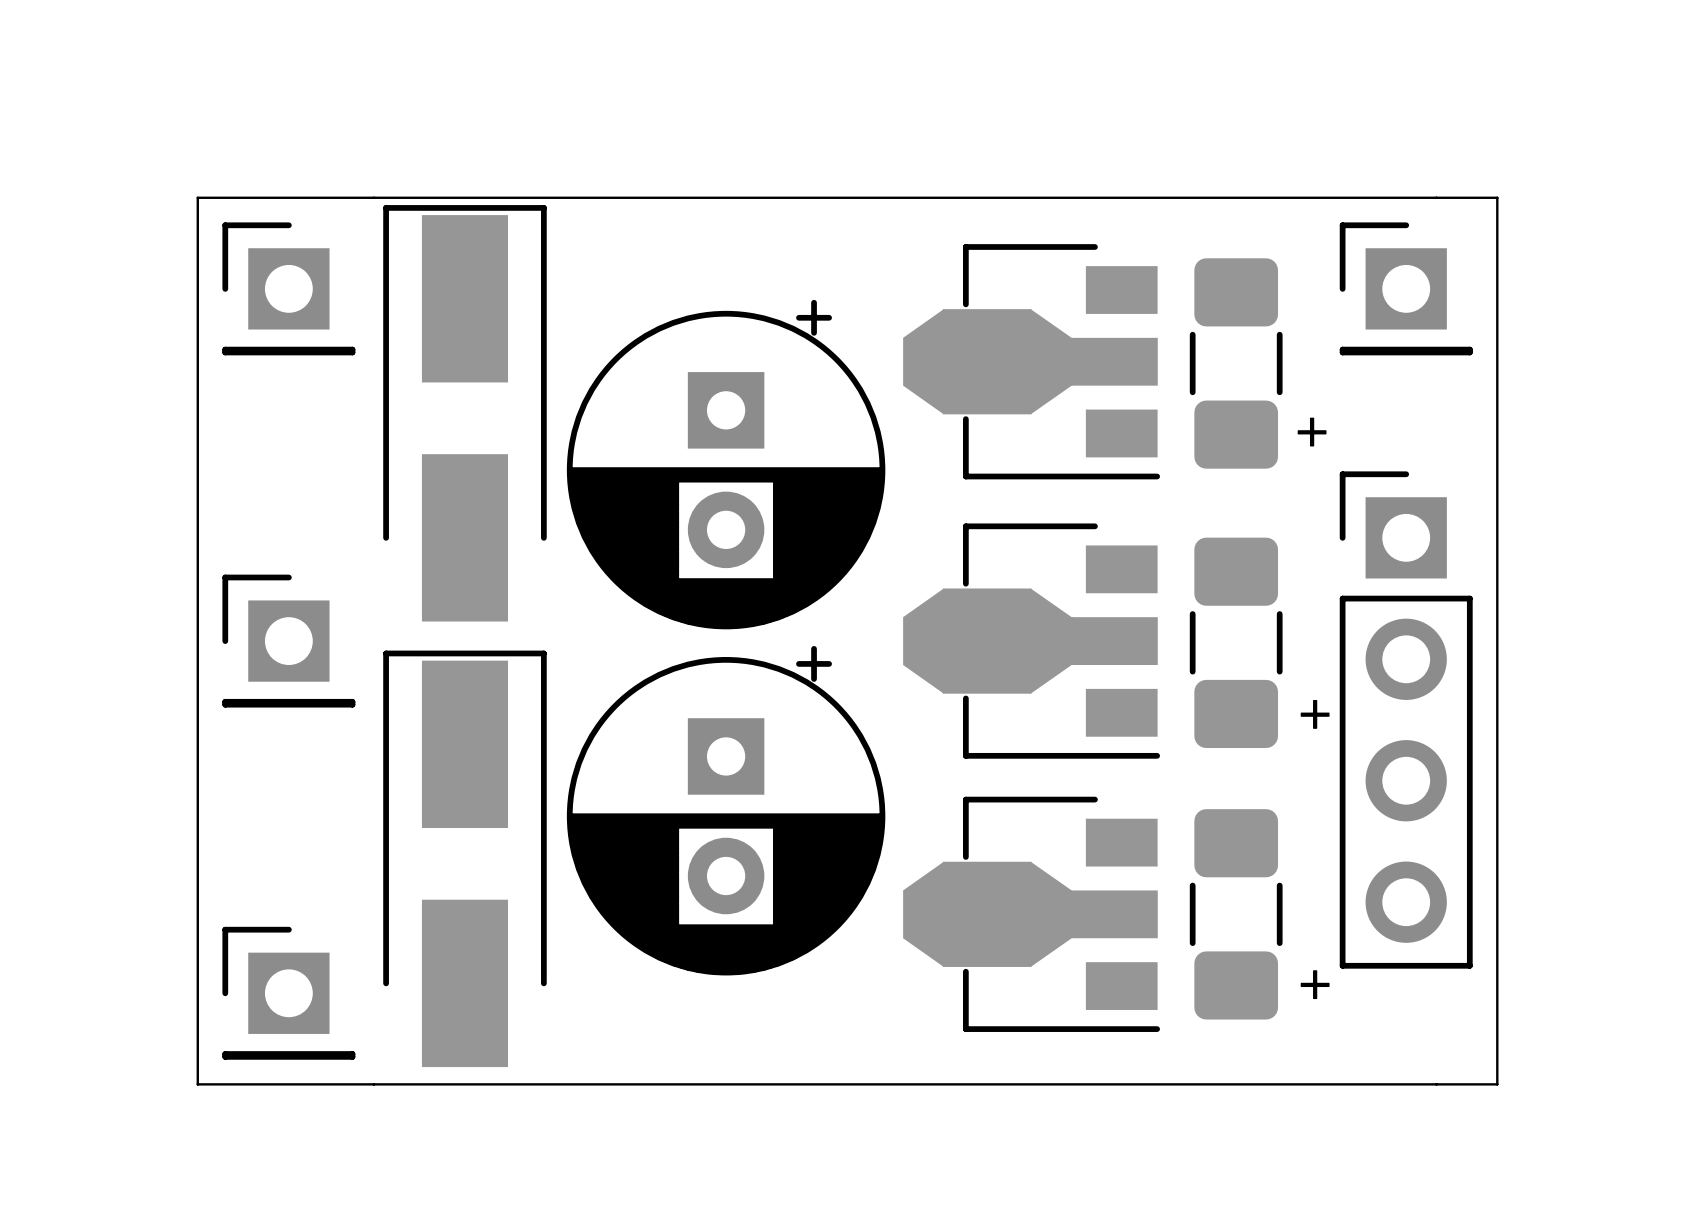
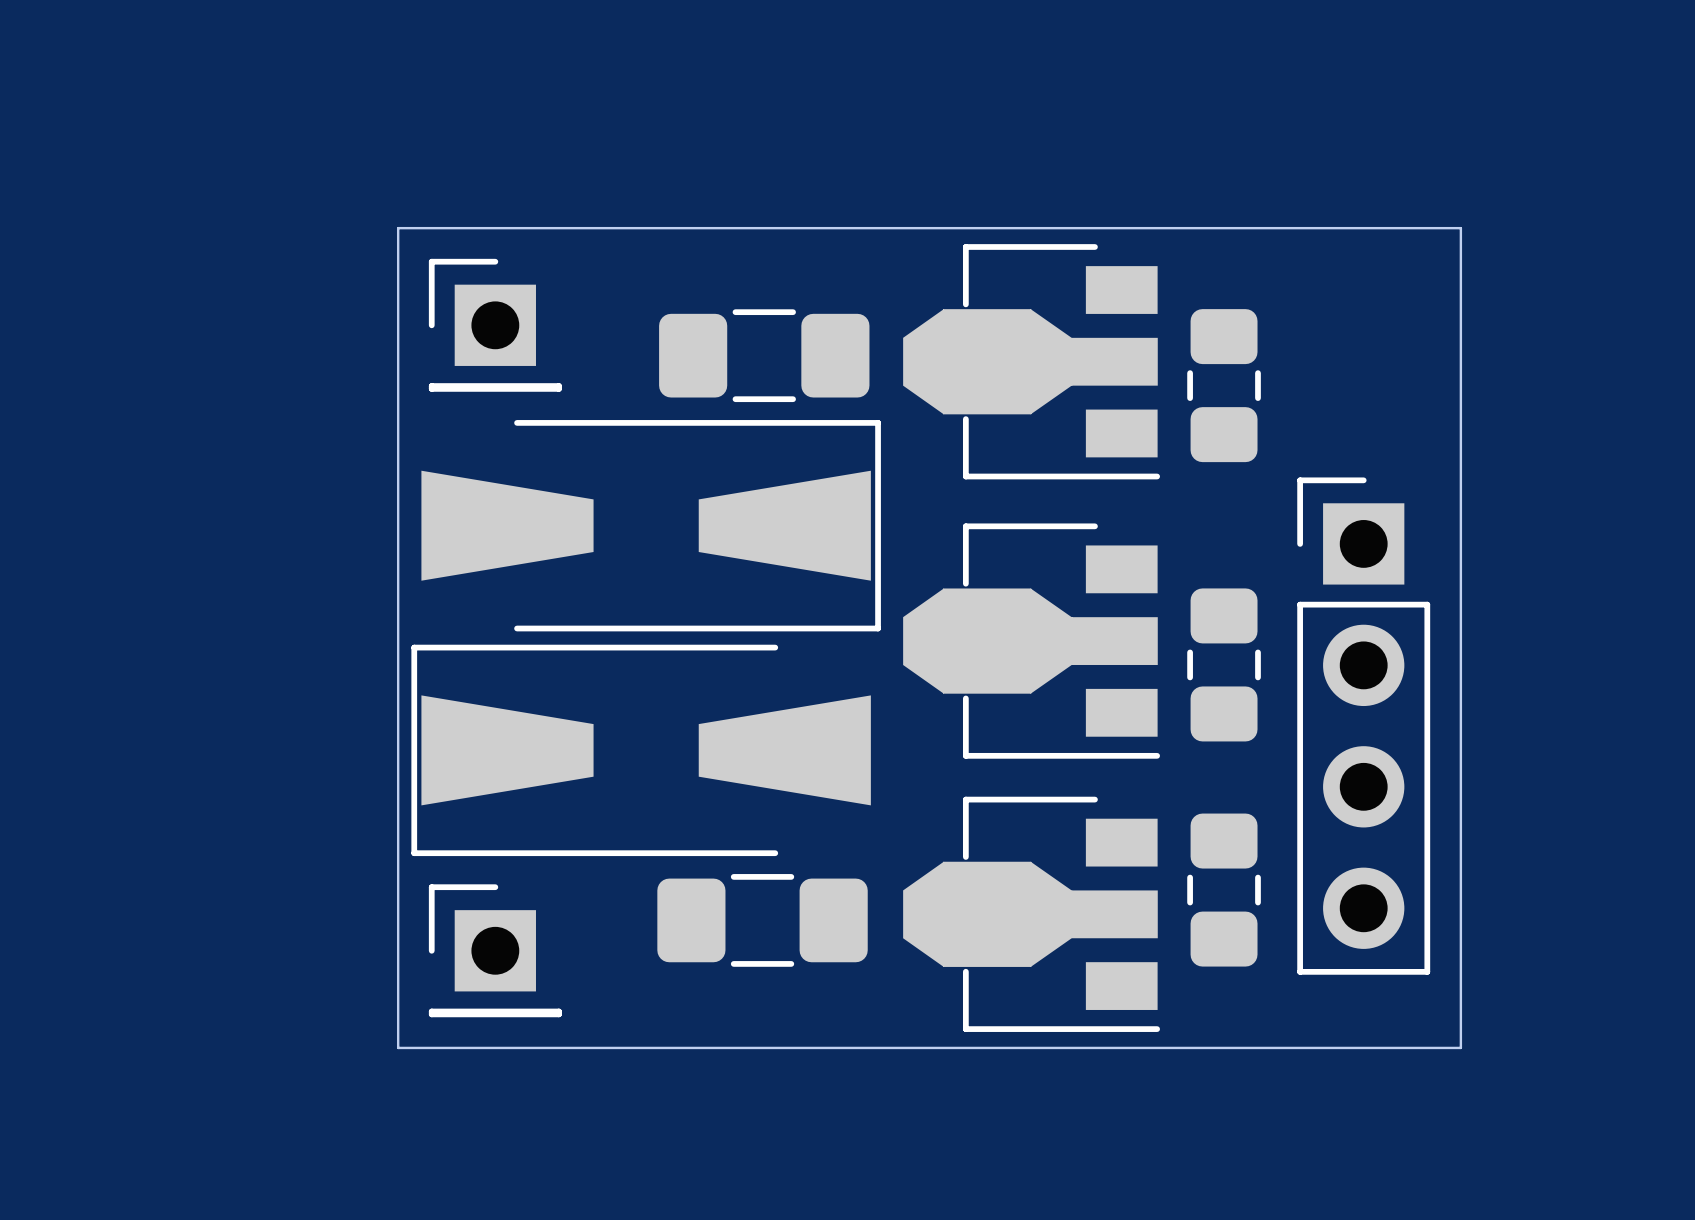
board edge: (197, 197) (197, 1084) (1497, 1084) (1497, 197) (197, 197) -> (398, 228) (398, 1047) (1460, 1047) (1460, 228) (398, 228)
part footprint: [1189, 258, 1283, 469] -> [1187, 309, 1261, 463]
part: (288, 288) -> none
part: (1406, 288) -> none
part: none -> (495, 325)
part: none -> (764, 355)
part: (464, 413) -> none
text: + (1312, 432) -> none
part: (726, 464) -> none
part: none -> (651, 525)
part footprint: [1189, 537, 1283, 749] -> [1187, 588, 1261, 742]
part: (288, 641) -> none
text: + (1315, 714) -> none
part position: (1406, 720) -> (1363, 726)
part: none -> (641, 750)
part footprint: [1189, 809, 1283, 1020] -> [1187, 813, 1261, 967]
part: (726, 810) -> none
part: (464, 858) -> none
part: none -> (762, 920)
part: none -> (495, 950)
text: + (1315, 984) -> none
part: (288, 993) -> none

